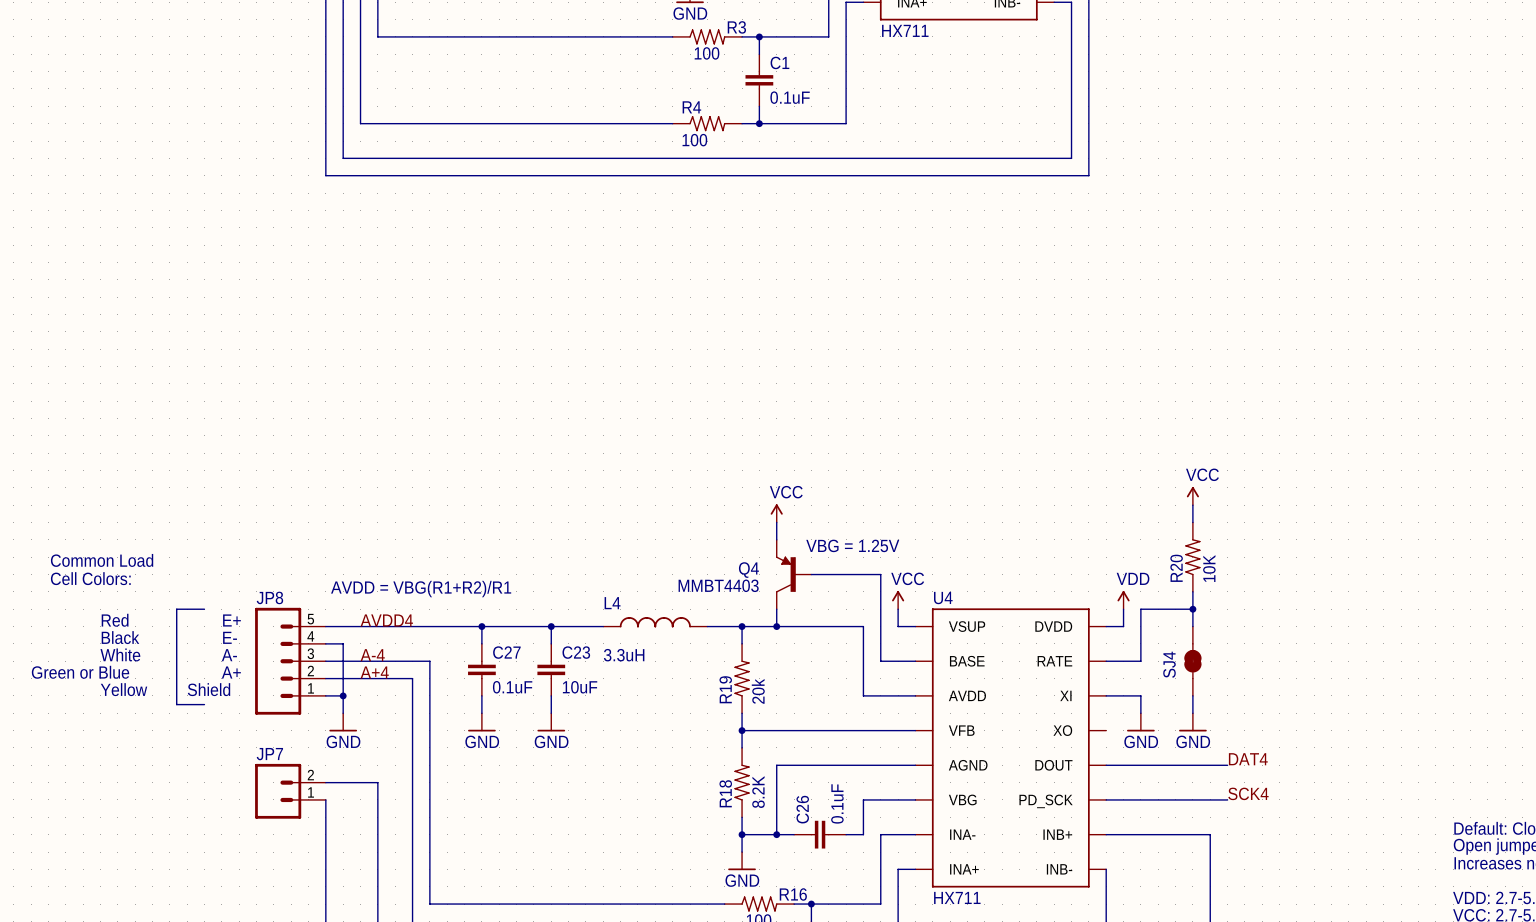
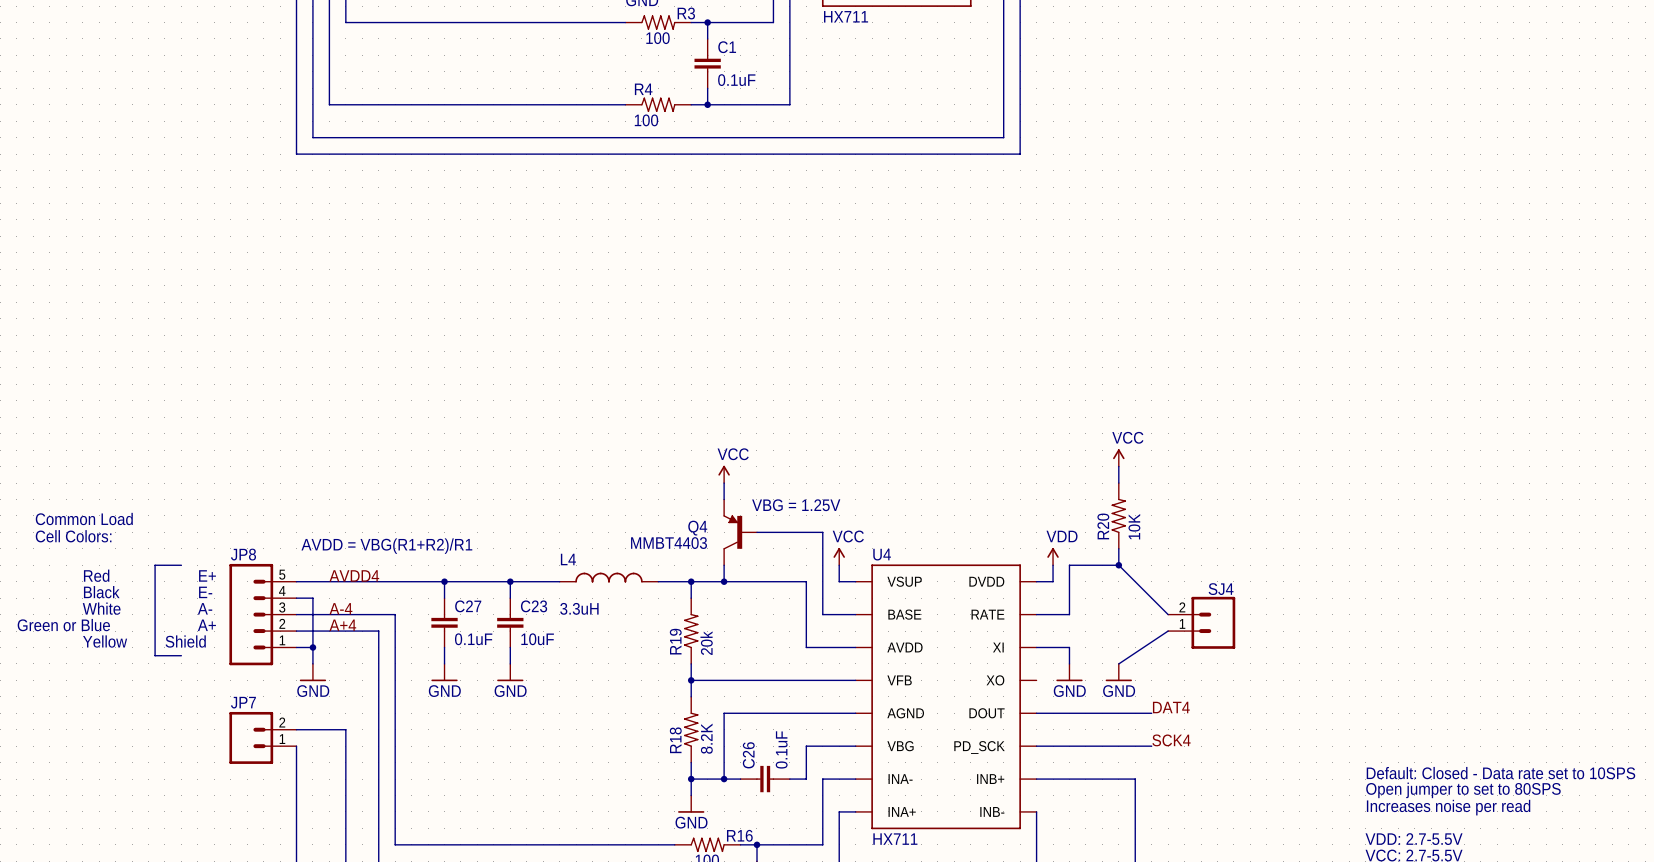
wire: (1192, 609) (1192, 626) -> (1118, 565) (1168, 614)
SJ4 symbol: [1184, 626, 1202, 696] -> [1168, 596, 1236, 649]
SJ4 name position: SJ4 (1169, 664) -> SJ4 (1221, 589)
wire: (1192, 695) (1192, 713) -> (1168, 631) (1118, 663)

